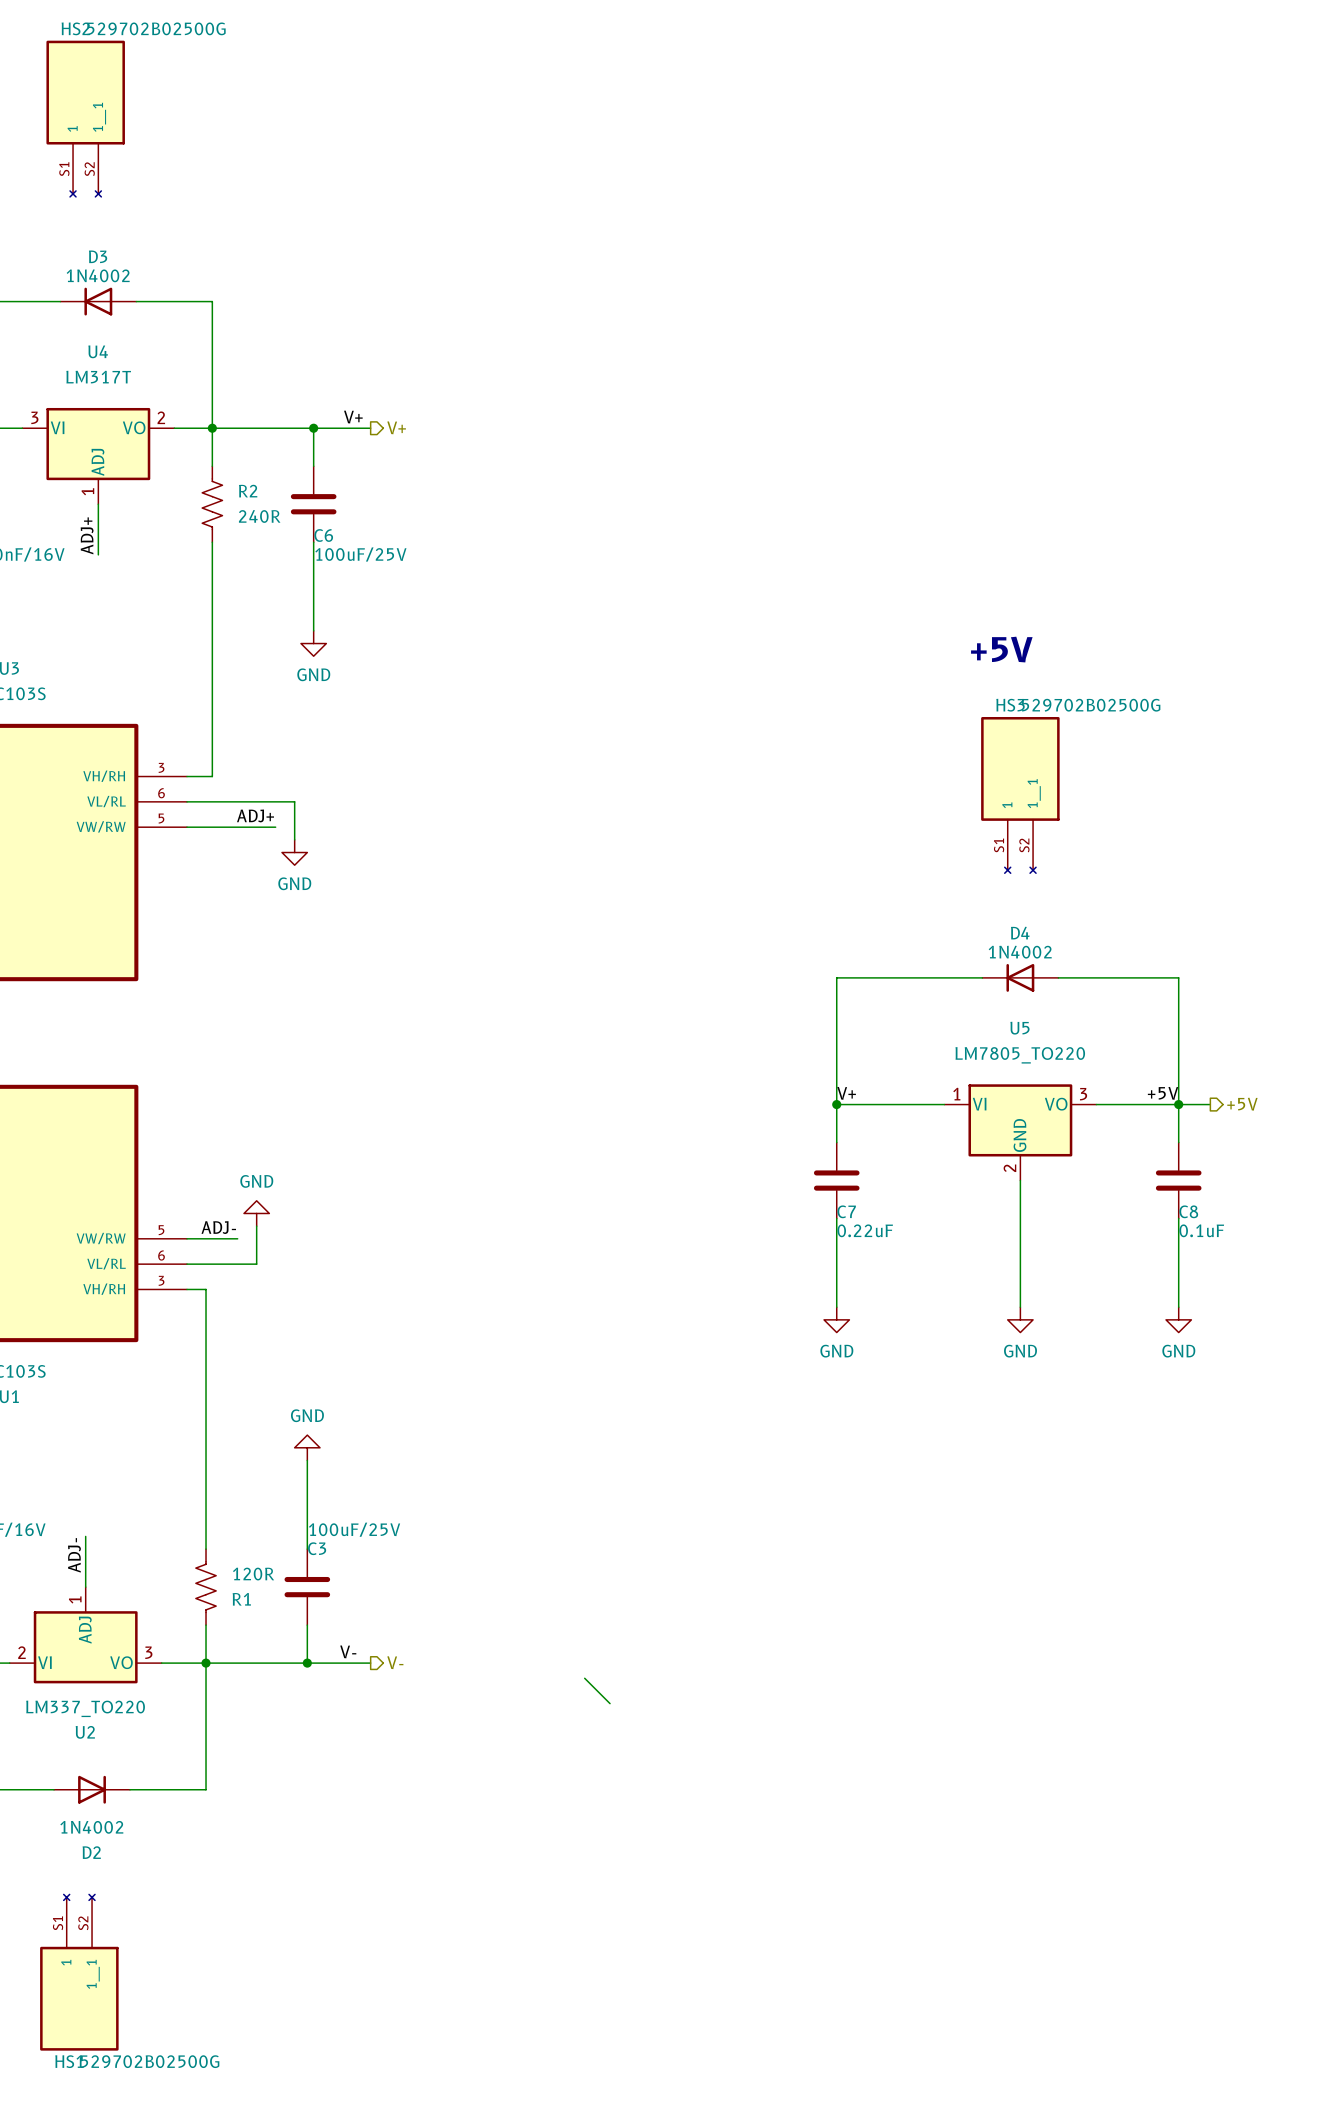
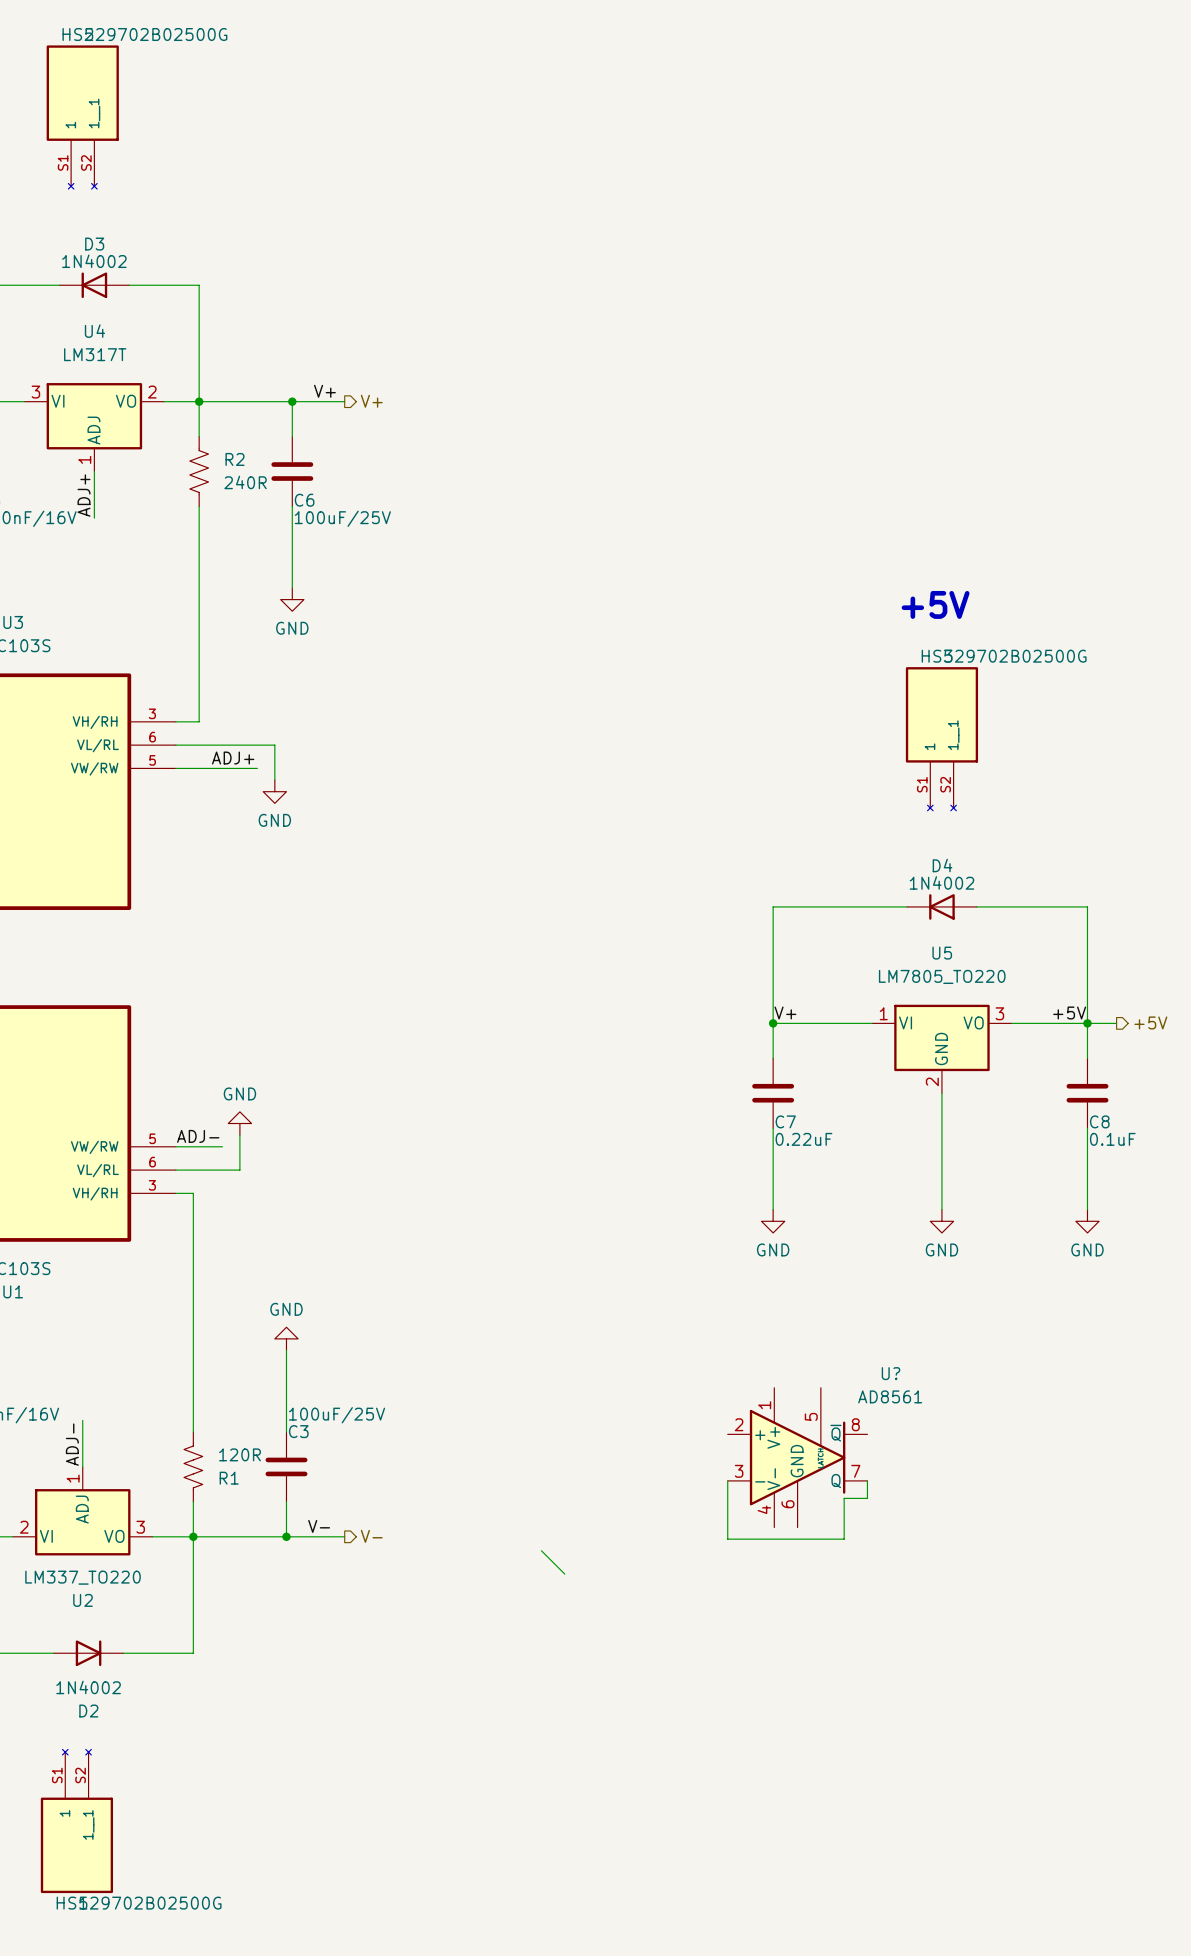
U?: none -> AD8561 (797, 1457)
wire: none -> (727, 1480) (727, 1539) (844, 1539) (844, 1498) (867, 1498) (867, 1480)

